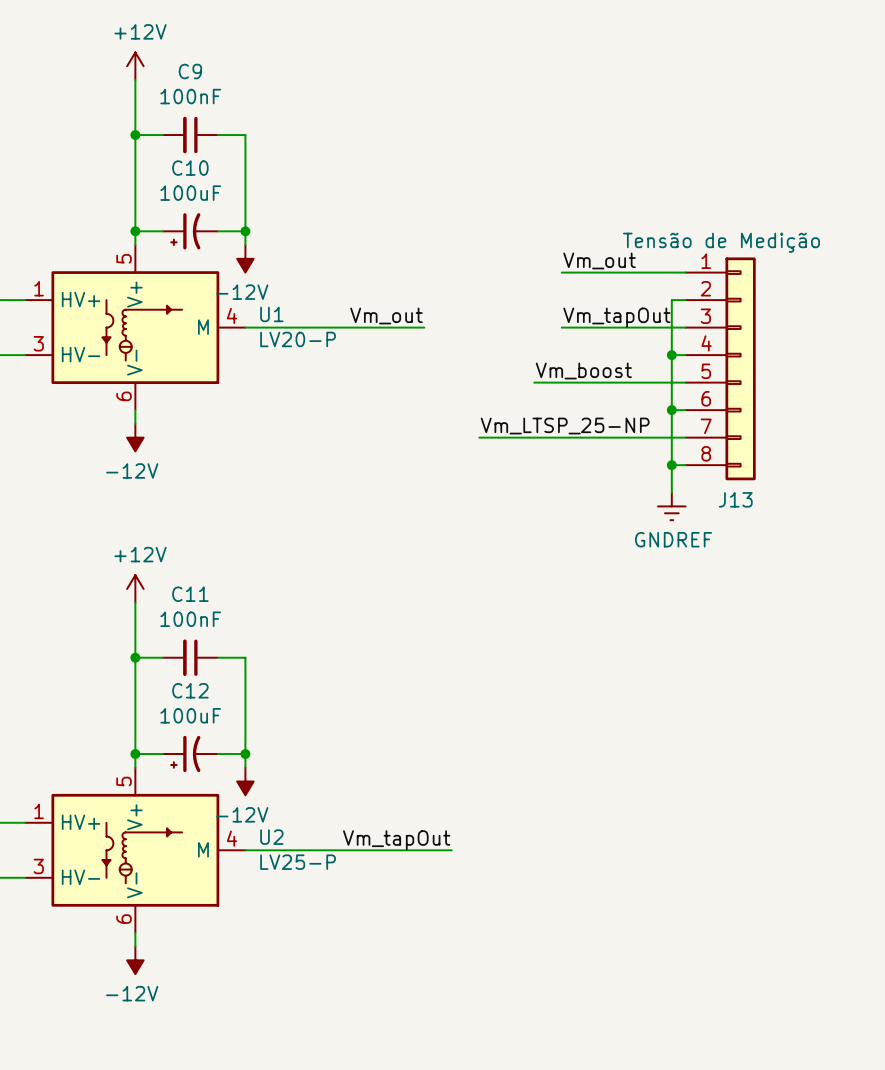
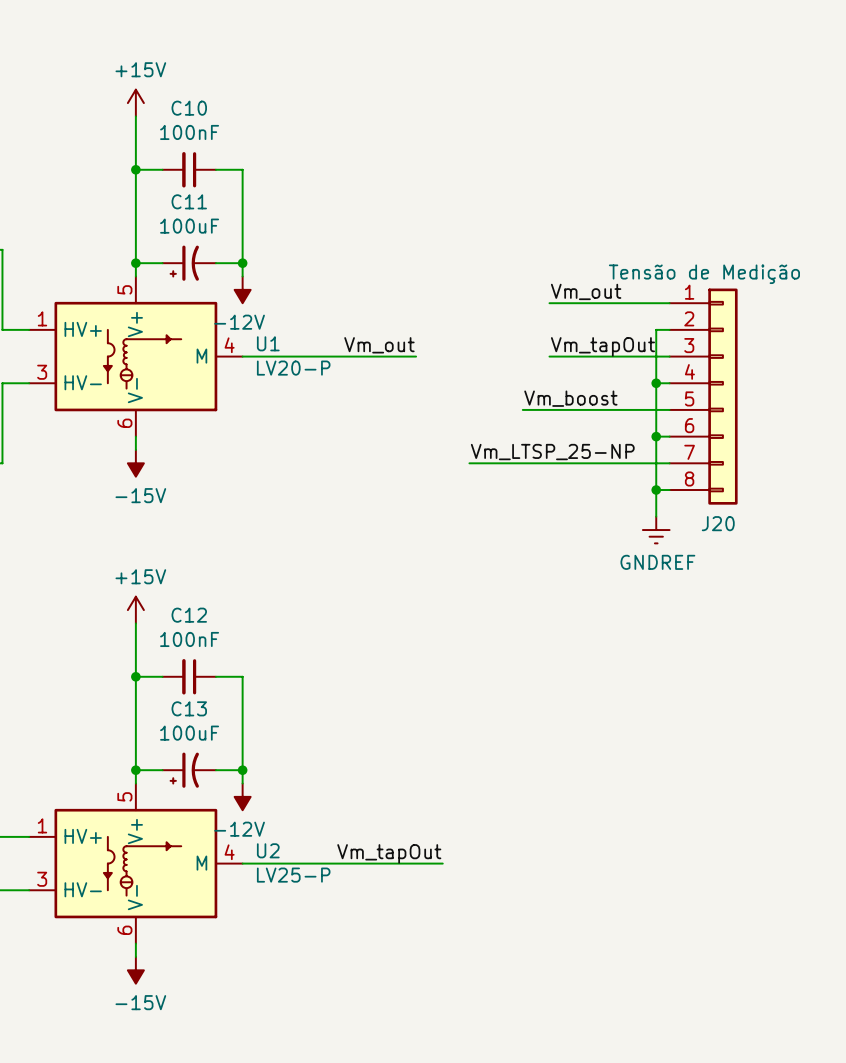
power symbol: +12V (135, 66) -> +15V (135, 103)
C9 name: C9 (190, 71) -> C10 (189, 108)
C10 name: C10 (190, 168) -> C11 (189, 201)
power symbol: -12V (135, 437) -> -15V (135, 463)
J13 name: J13 (735, 499) -> J20 (718, 523)
power symbol: +12V (135, 588) -> +15V (135, 610)
C11 name: C11 (190, 594) -> C12 (189, 615)
C12 name: C12 (190, 690) -> C13 (189, 708)
power symbol: -12V (135, 960) -> -15V (135, 970)

